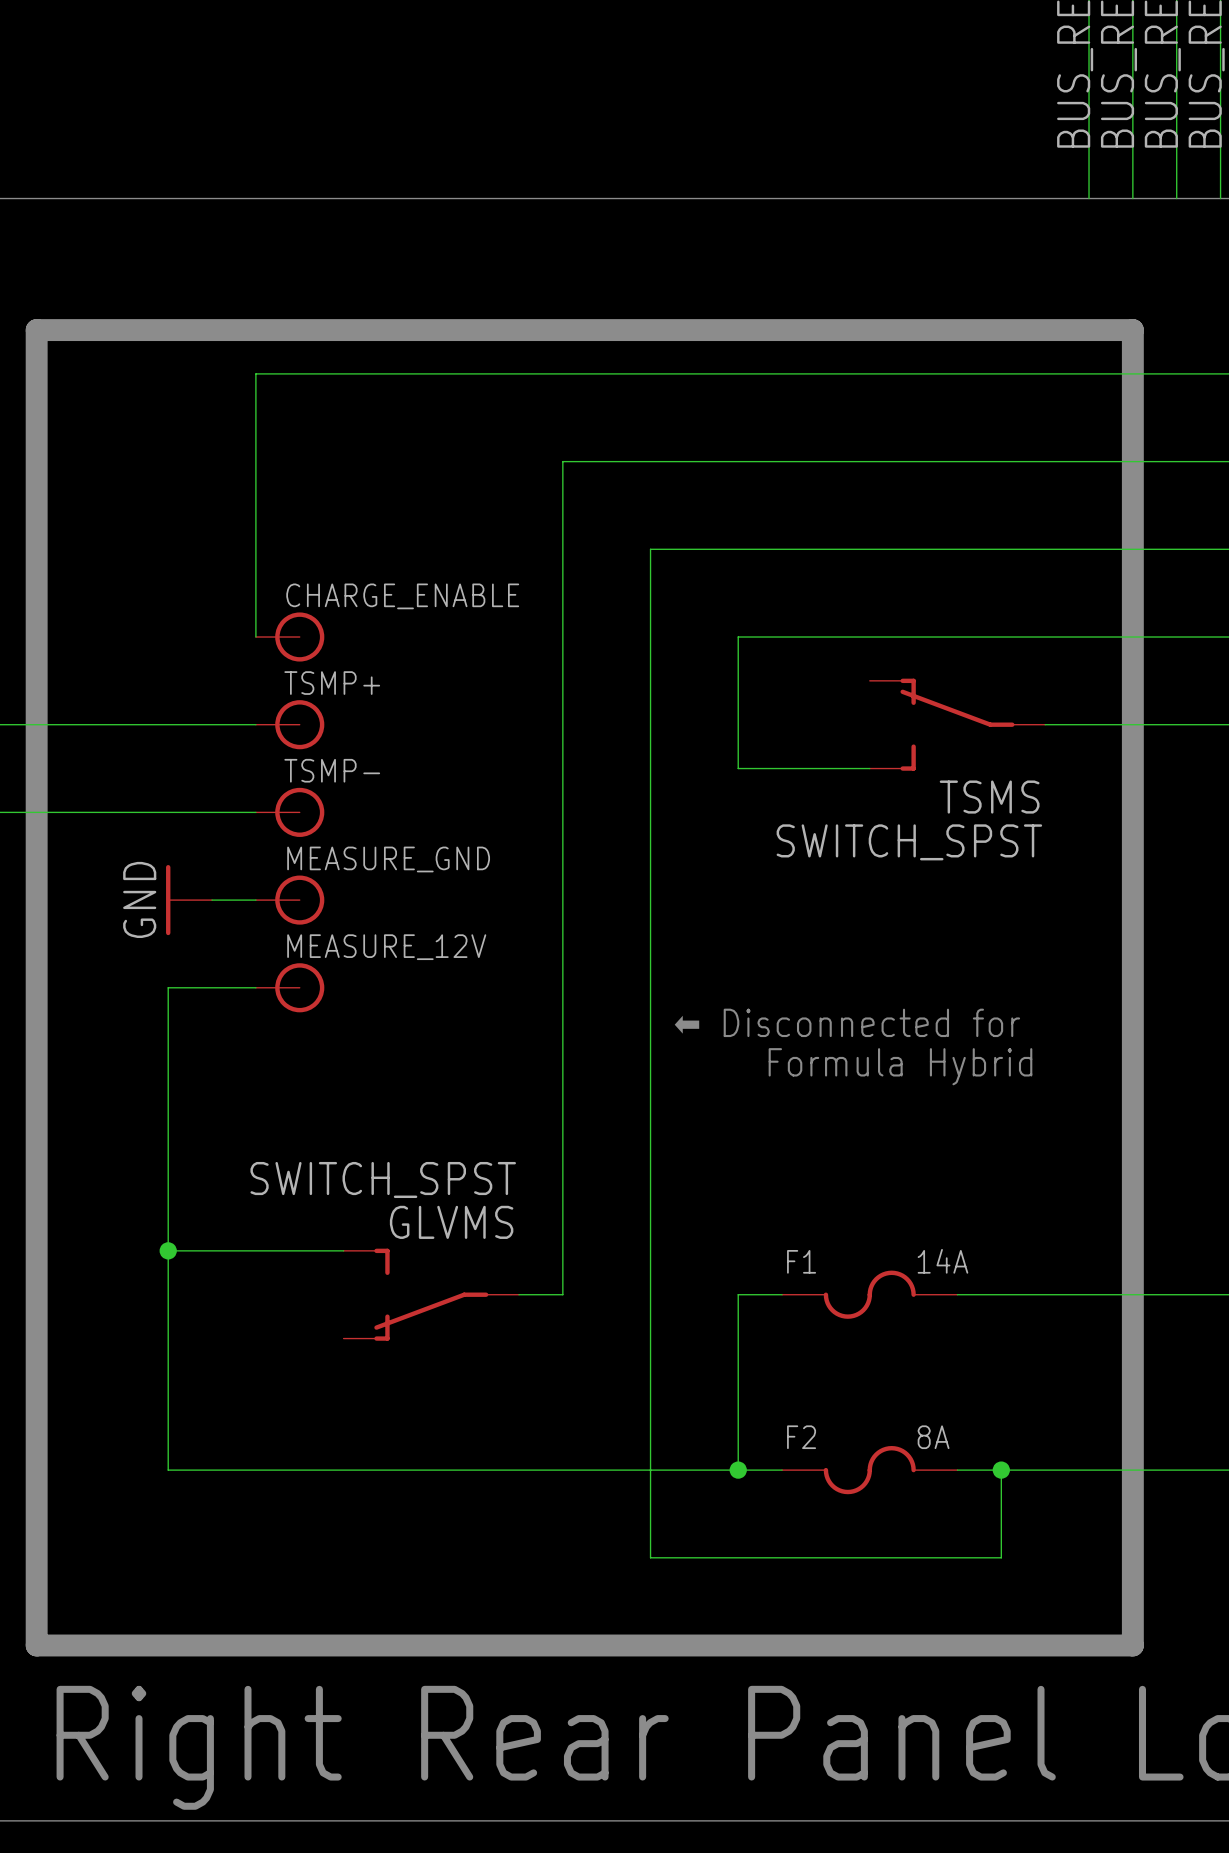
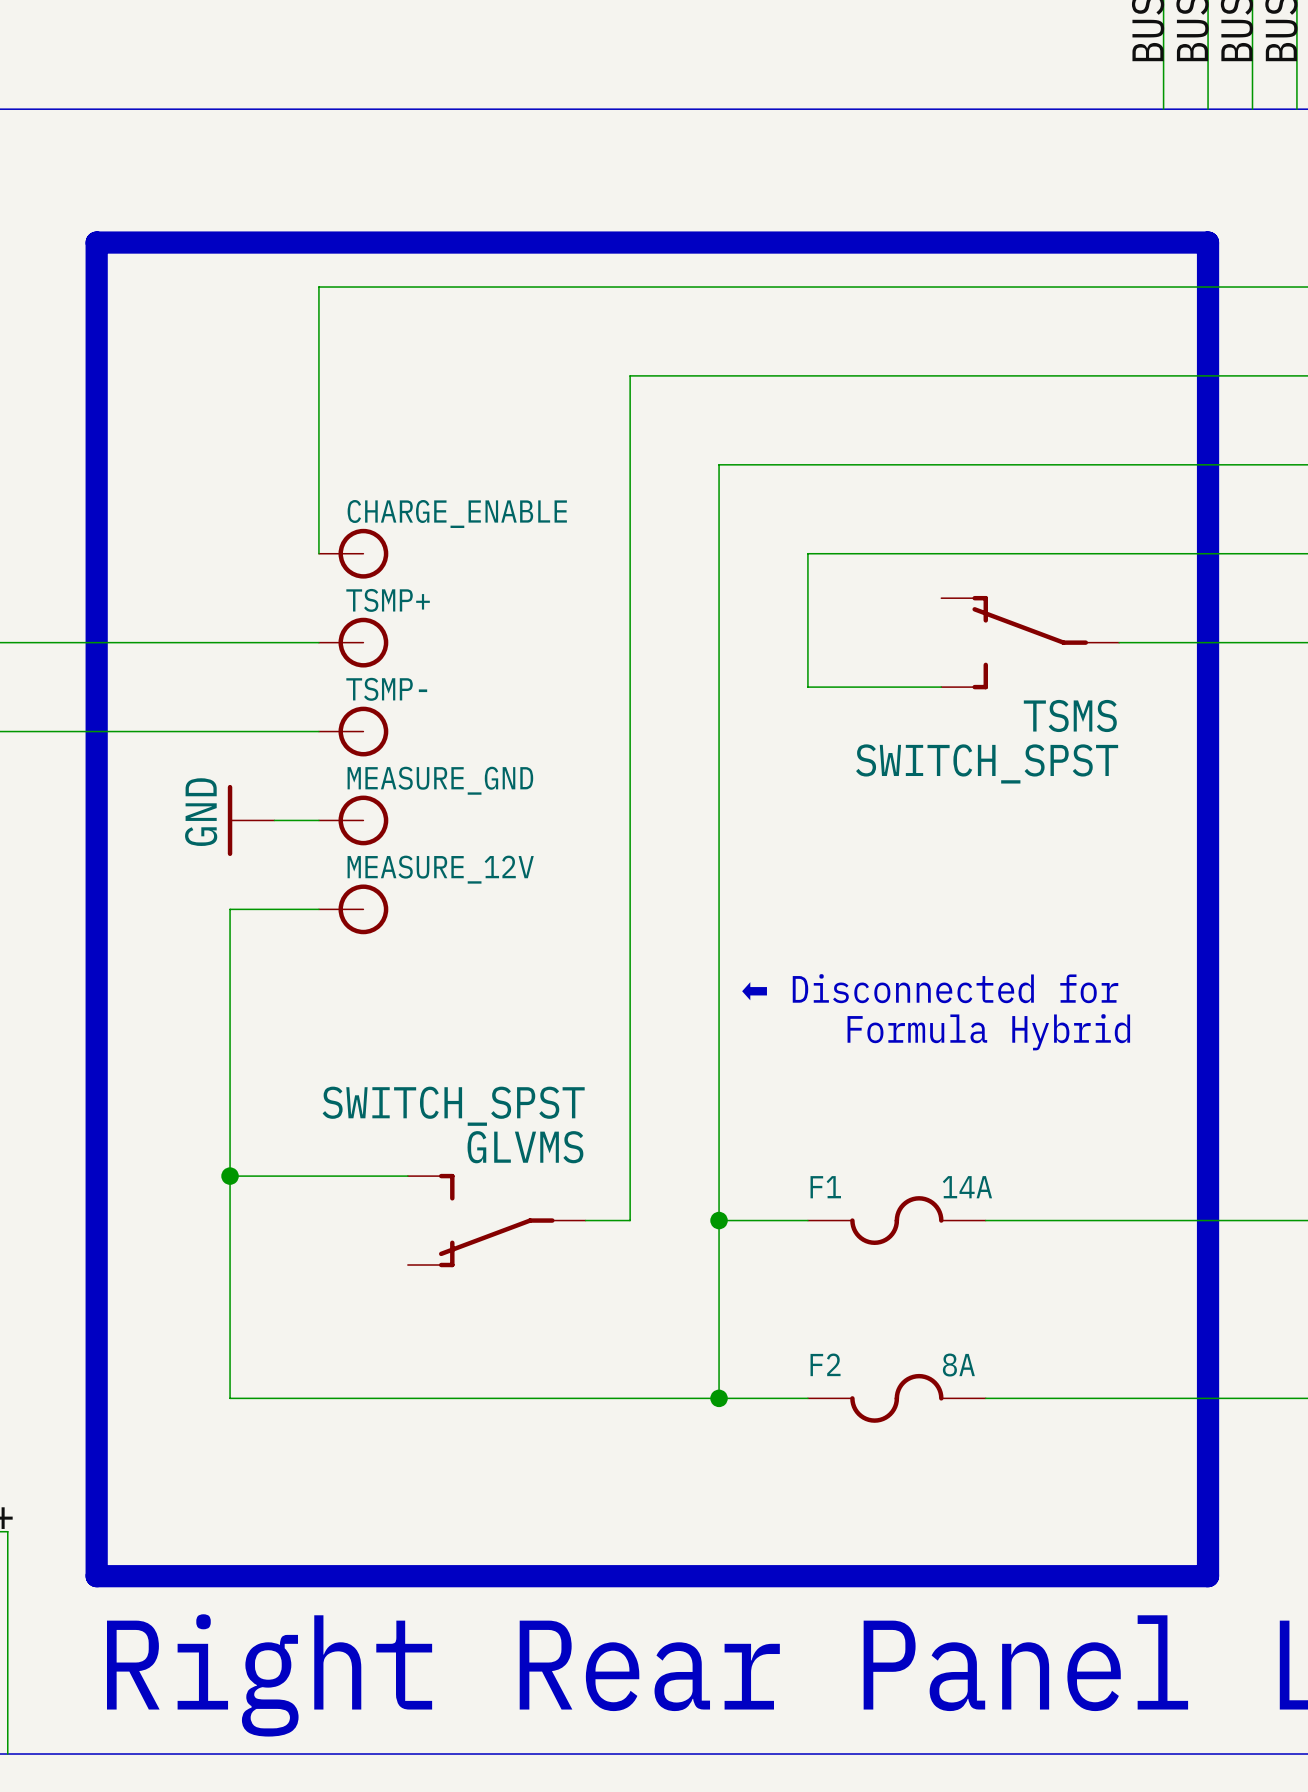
text position: ⬅ Disconnected for (846, 1022) -> ⬅ Disconnected for (930, 988)
text position: Formula Hybrid (900, 1066) -> Formula Hybrid (988, 1032)
wire: none -> (719, 1220) (807, 1220)
junction: none -> (719, 1220)
wire: (782, 1294) (738, 1294) (738, 1470) (782, 1470) -> none
F1 position: (869, 1294) -> (896, 1220)
wire: (650, 1470) (650, 1557) (1001, 1557) (1001, 1470) -> none
junction position: (738, 1470) -> (719, 1398)
F2 position: (869, 1470) -> (896, 1398)
junction: (1001, 1470) -> none

